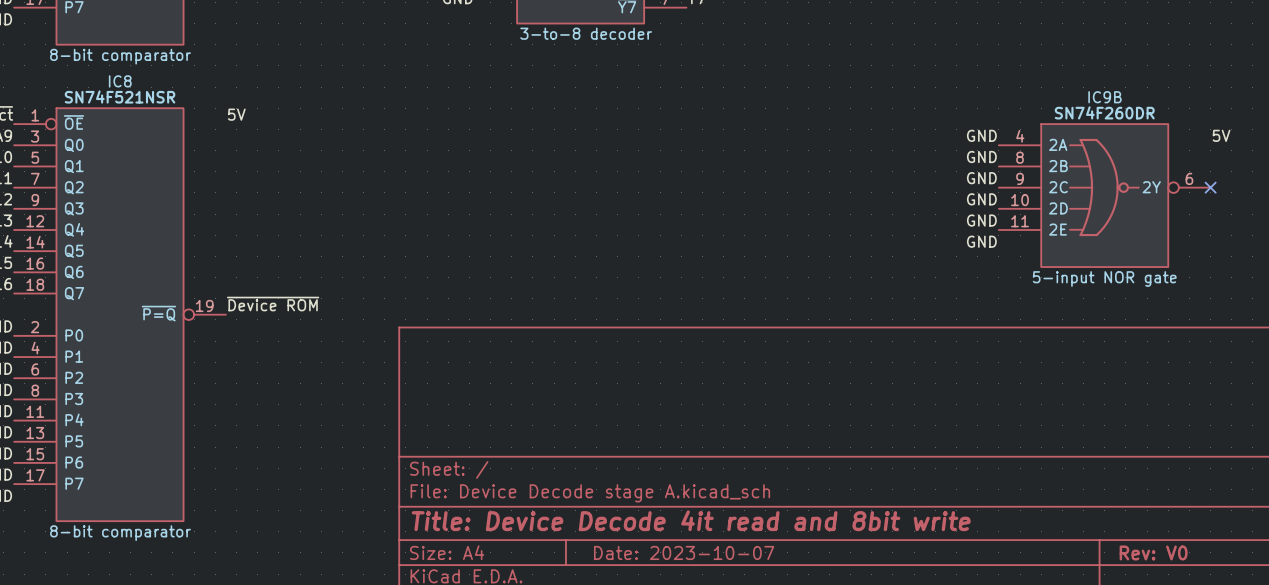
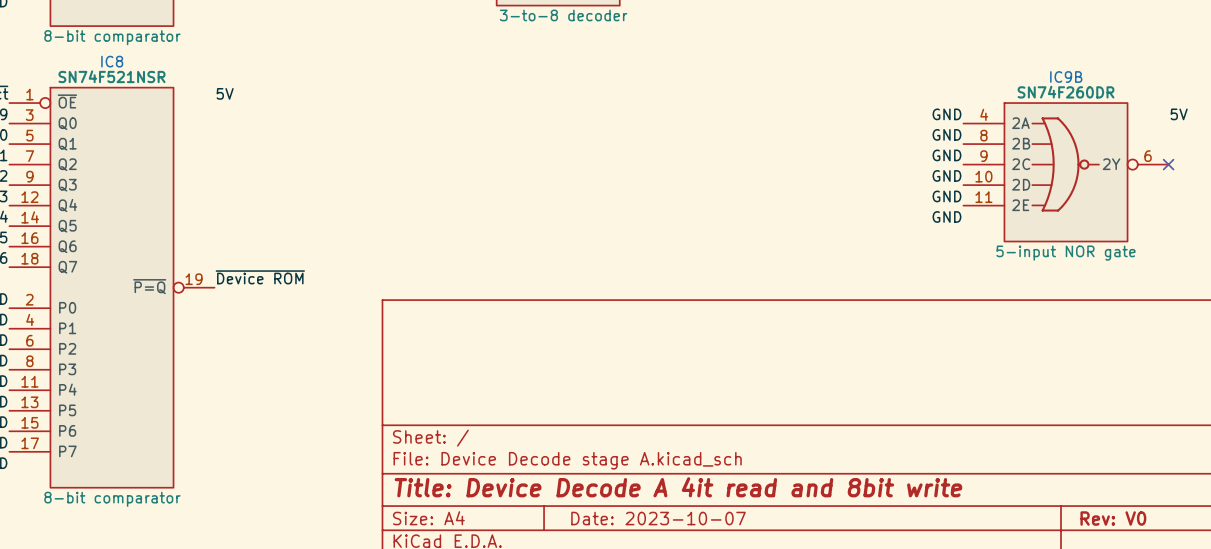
title block: Title: Device Decode 4it read and 8bit write (691, 520) -> Title: Device Decode A 4it read and 8bit write (678, 487)

